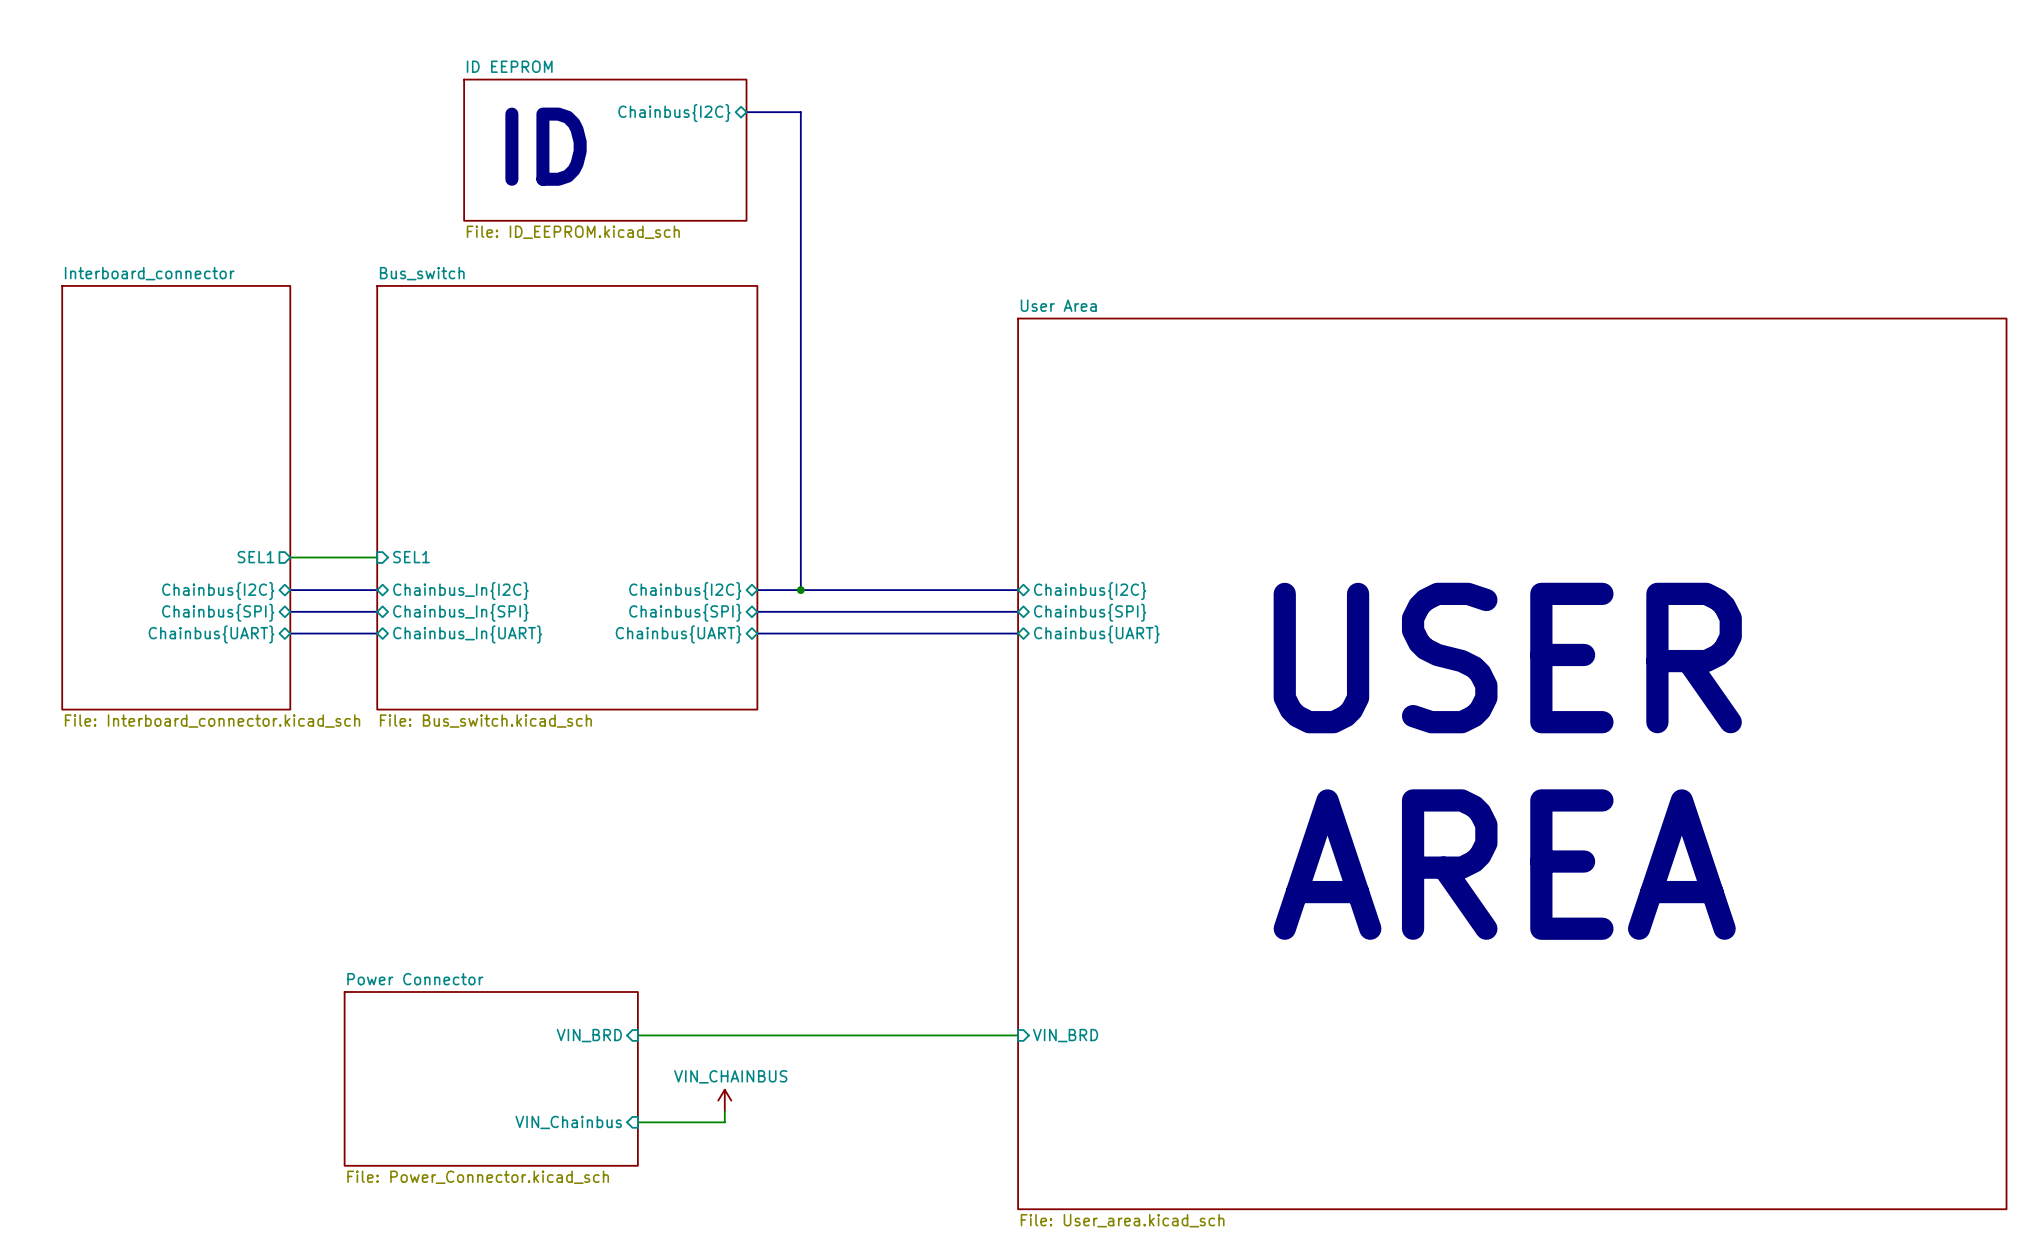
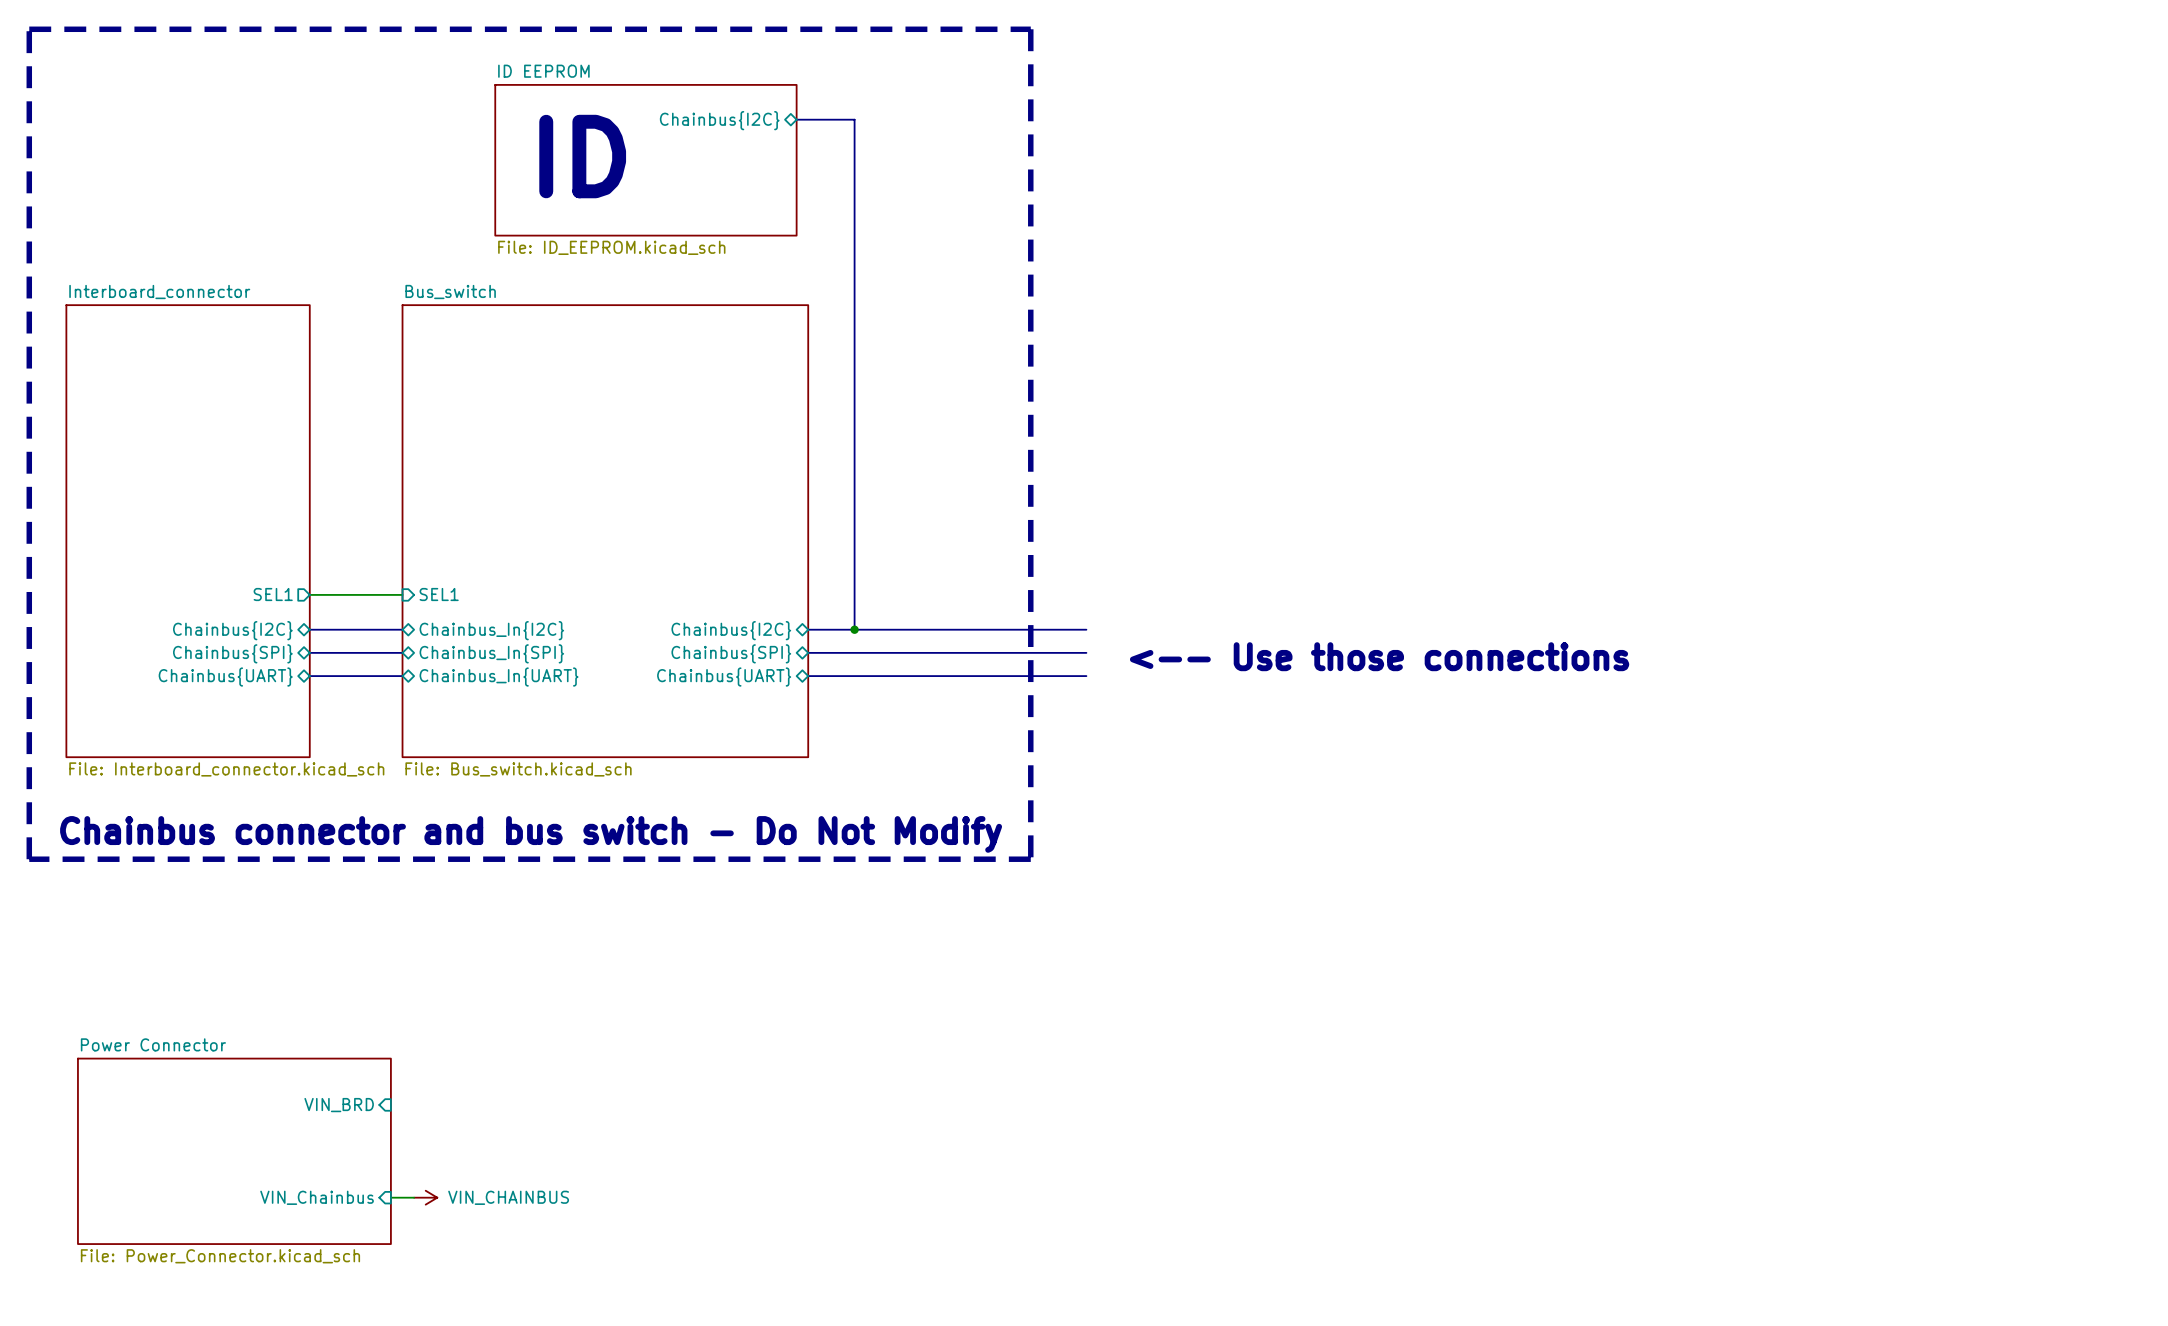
line: none -> (29, 29) (1030, 29) (1030, 859) (29, 859) (29, 29)
sheet pin: Chainbus{I2C} (1090, 590) -> none
sheet pin: Chainbus{SPI} (1090, 612) -> none
text: none -> <-- Use those connections (1379, 656)
sheet pin: Chainbus{UART} (1096, 634) -> none
text: USER (1507, 658) -> none
sheet User Area: File: User_area.kicad_sch (1512, 763) -> none
text: none -> Chainbus connector and bus switch - Do Not Modify (531, 834)
text: AREA (1504, 864) -> none
sheet pin: none -> VIN_BRD (339, 1105)
sheet pin: VIN_BRD (589, 1035) -> none
wire: (637, 1035) (1018, 1035) -> none
sheet pin: VIN_BRD (1065, 1035) -> none
sheet Power Connector: none -> File: Power_Connector.kicad_sch (234, 1151)
sheet Power Connector: File: Power_Connector.kicad_sch (491, 1078) -> none
power symbol: VIN_CHAINBUS (724, 1100) -> none
wire: (724, 1111) (724, 1122) (637, 1122) -> none
sheet pin: none -> VIN_Chainbus (317, 1197)
wire: none -> (390, 1197) (414, 1197)
power symbol: none -> VIN_CHAINBUS (425, 1197)
sheet pin: VIN_Chainbus (568, 1122) -> none

